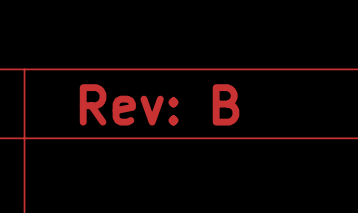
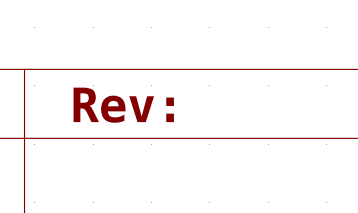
title block: Rev: B (159, 104) -> Rev: (123, 105)

